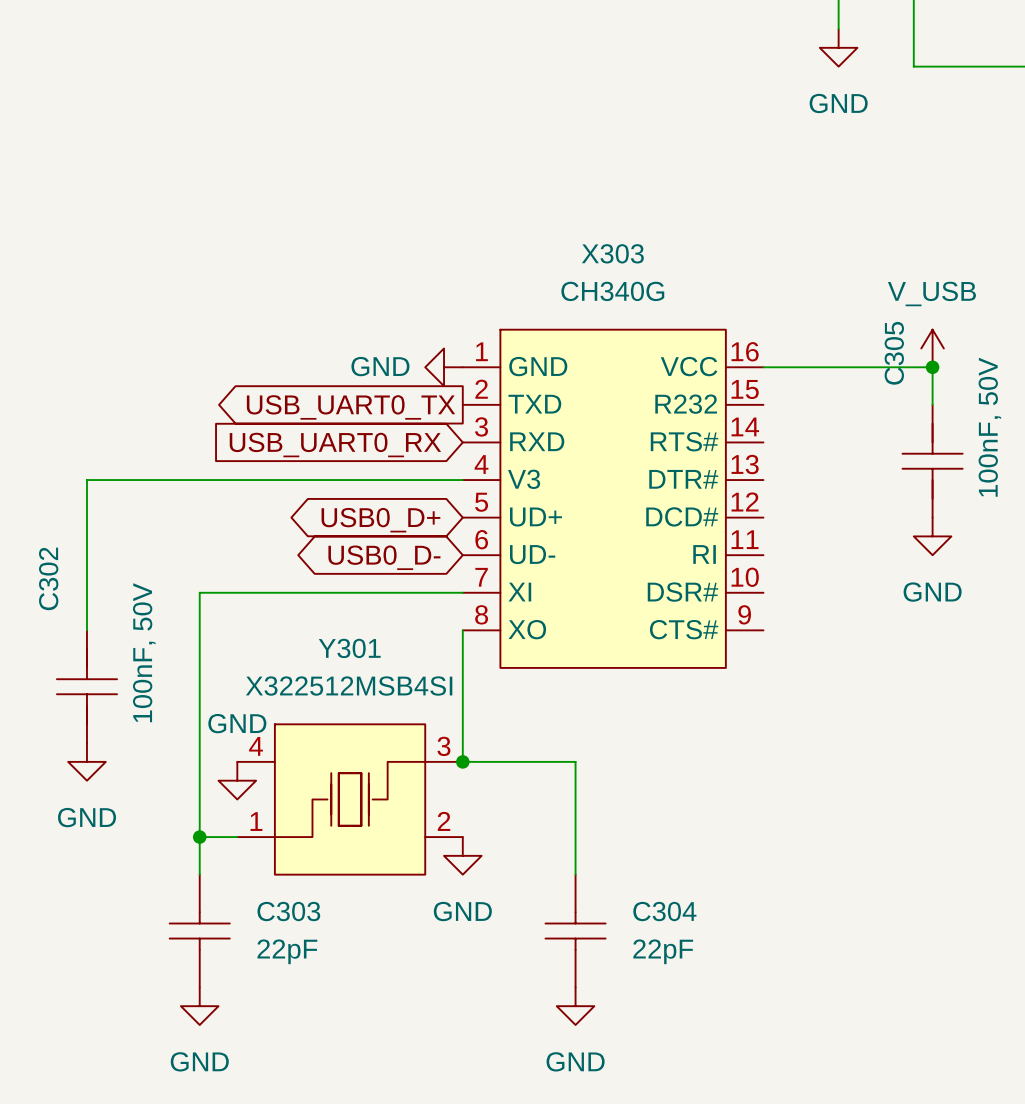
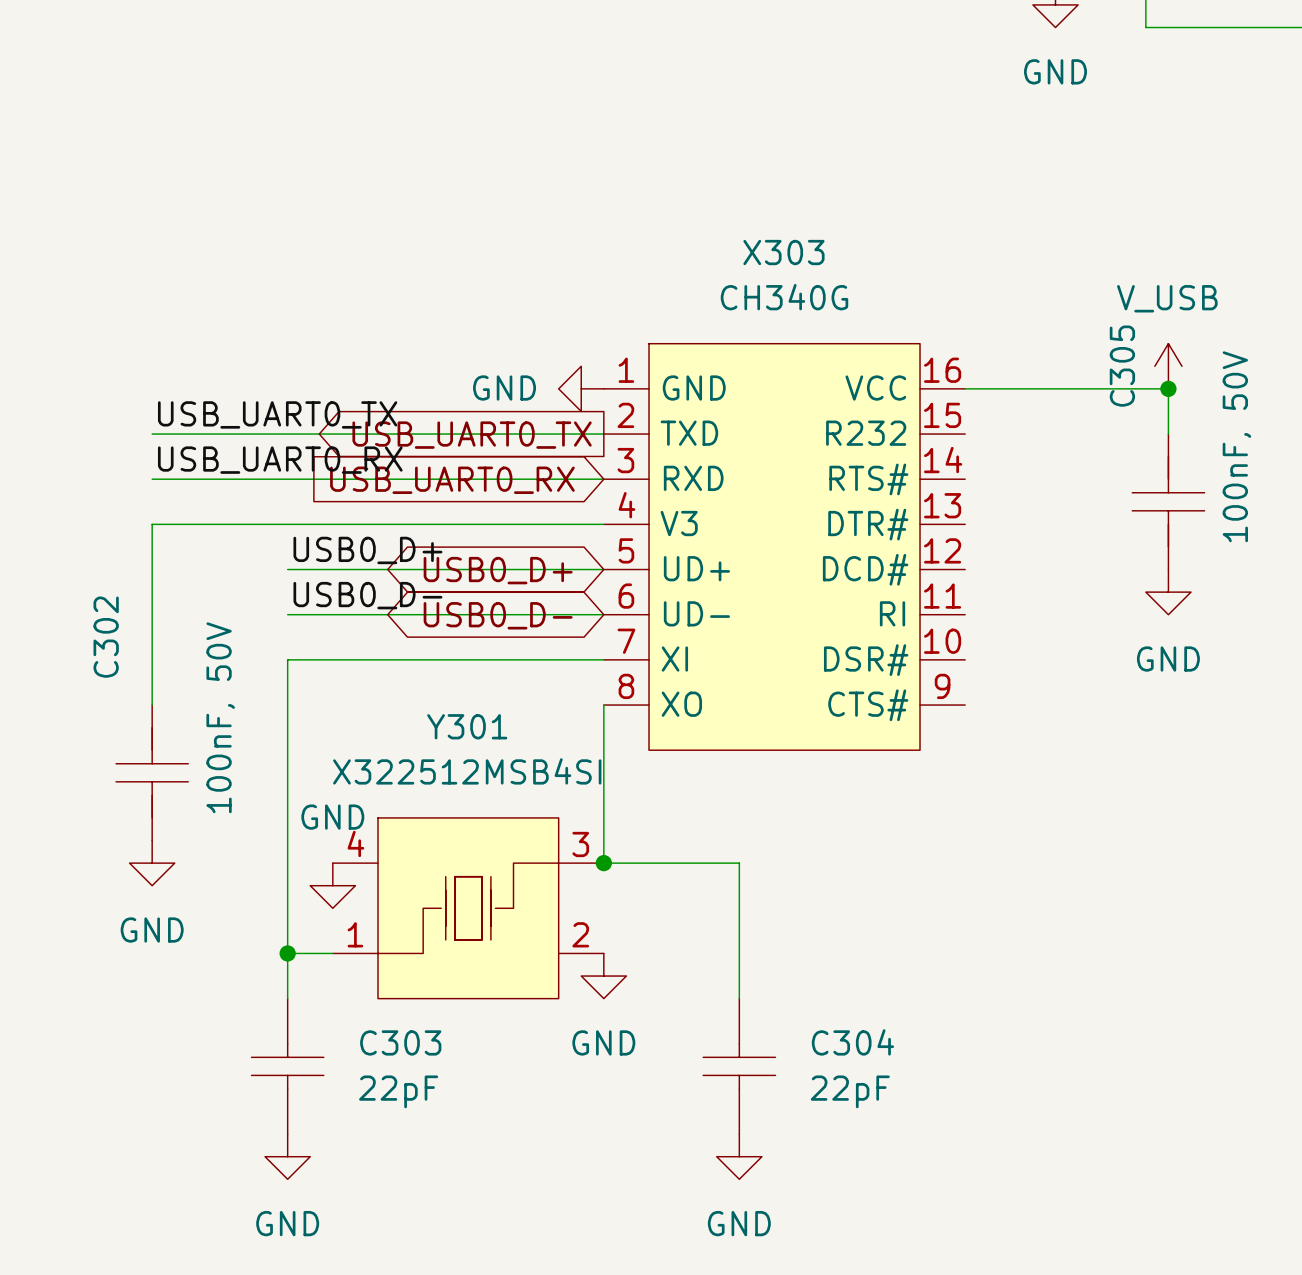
label: none -> USB_UART0_TX (277, 414)
wire: none -> (152, 434) (603, 434)
label: none -> USB_UART0_RX (280, 460)
wire: none -> (152, 479) (603, 479)
label: none -> USB0_D+ (367, 550)
wire: none -> (287, 569) (603, 569)
label: none -> USB0_D- (367, 595)
wire: none -> (287, 614) (603, 614)

